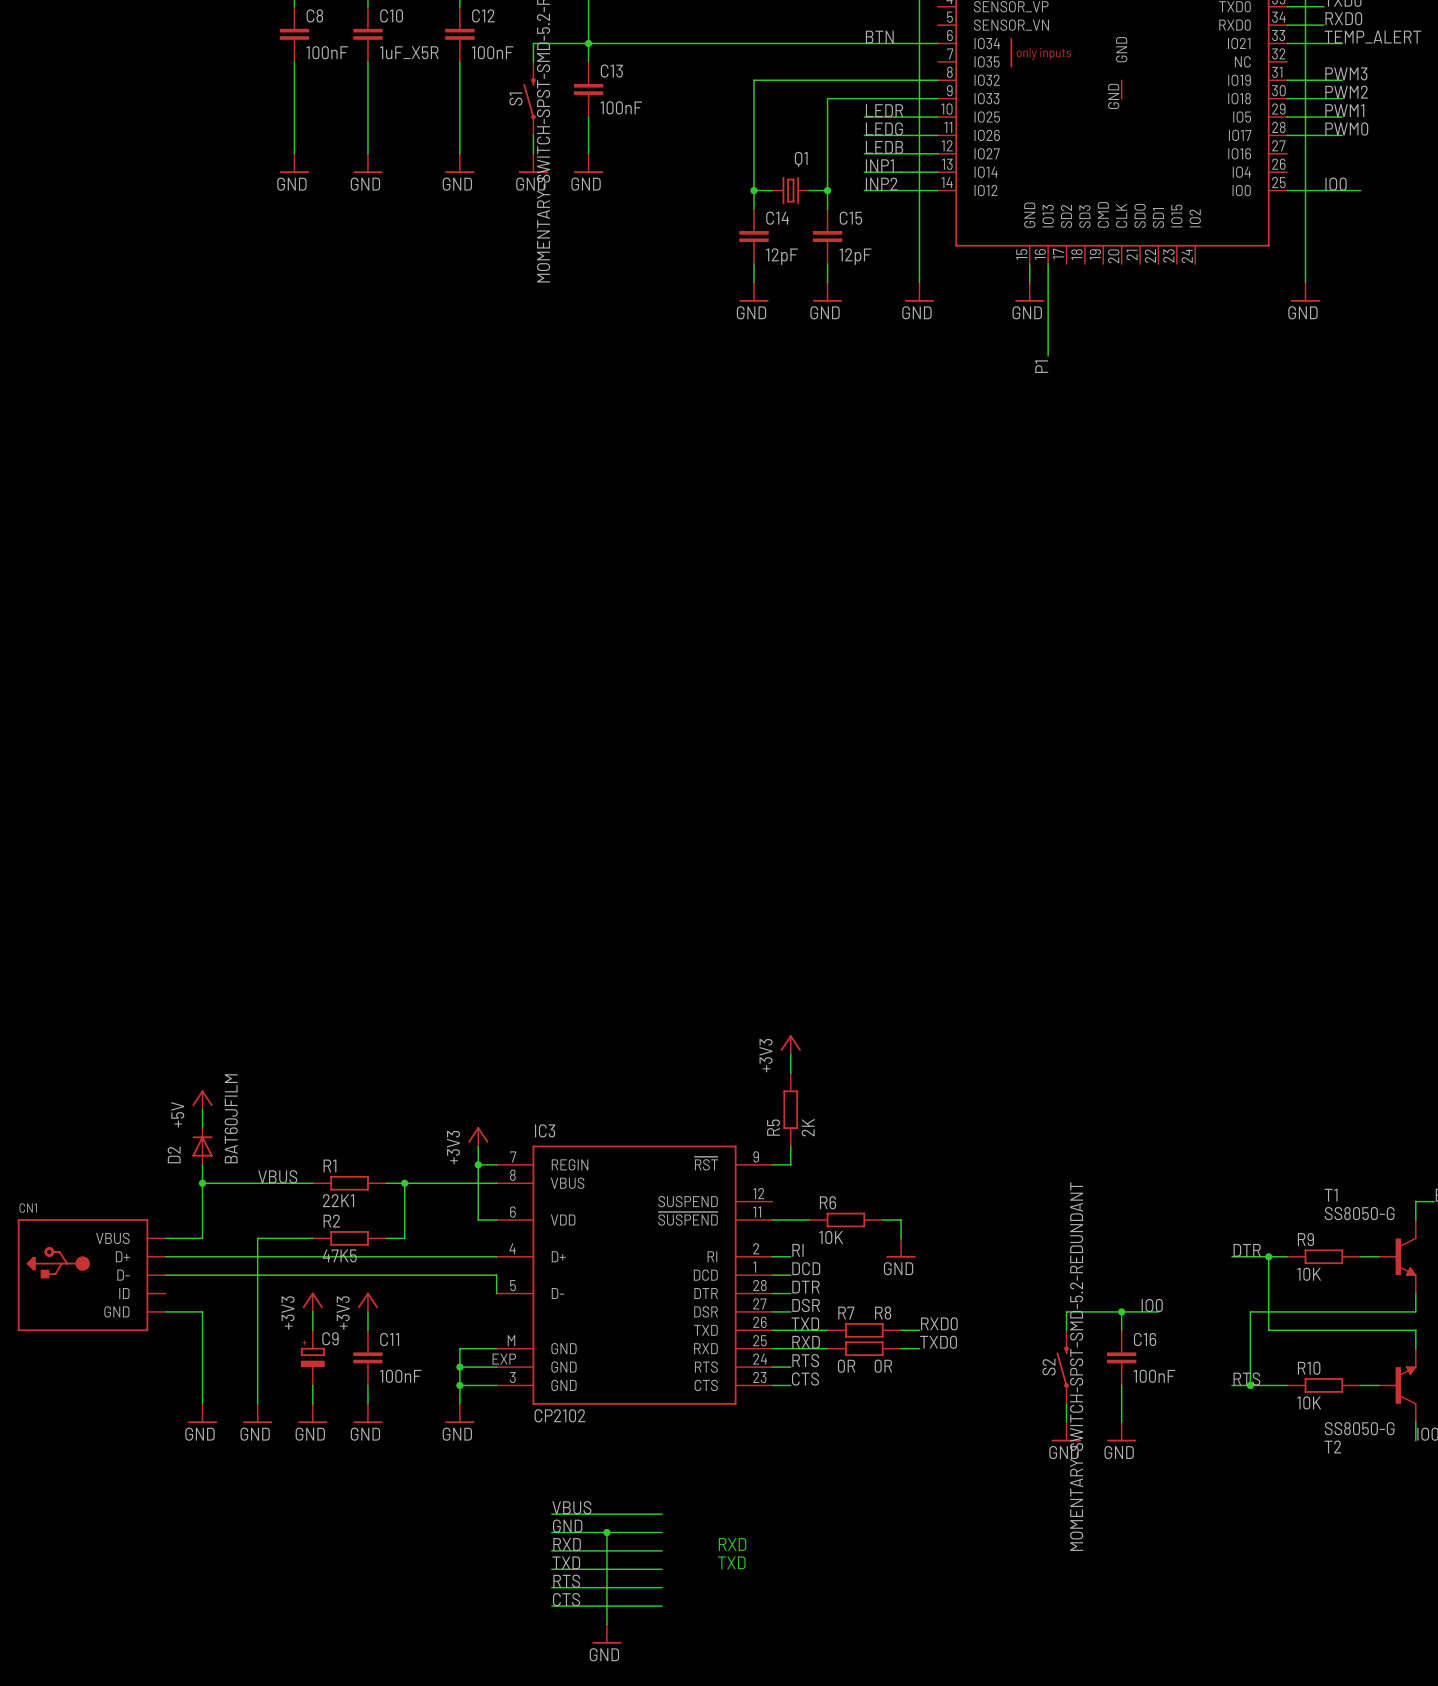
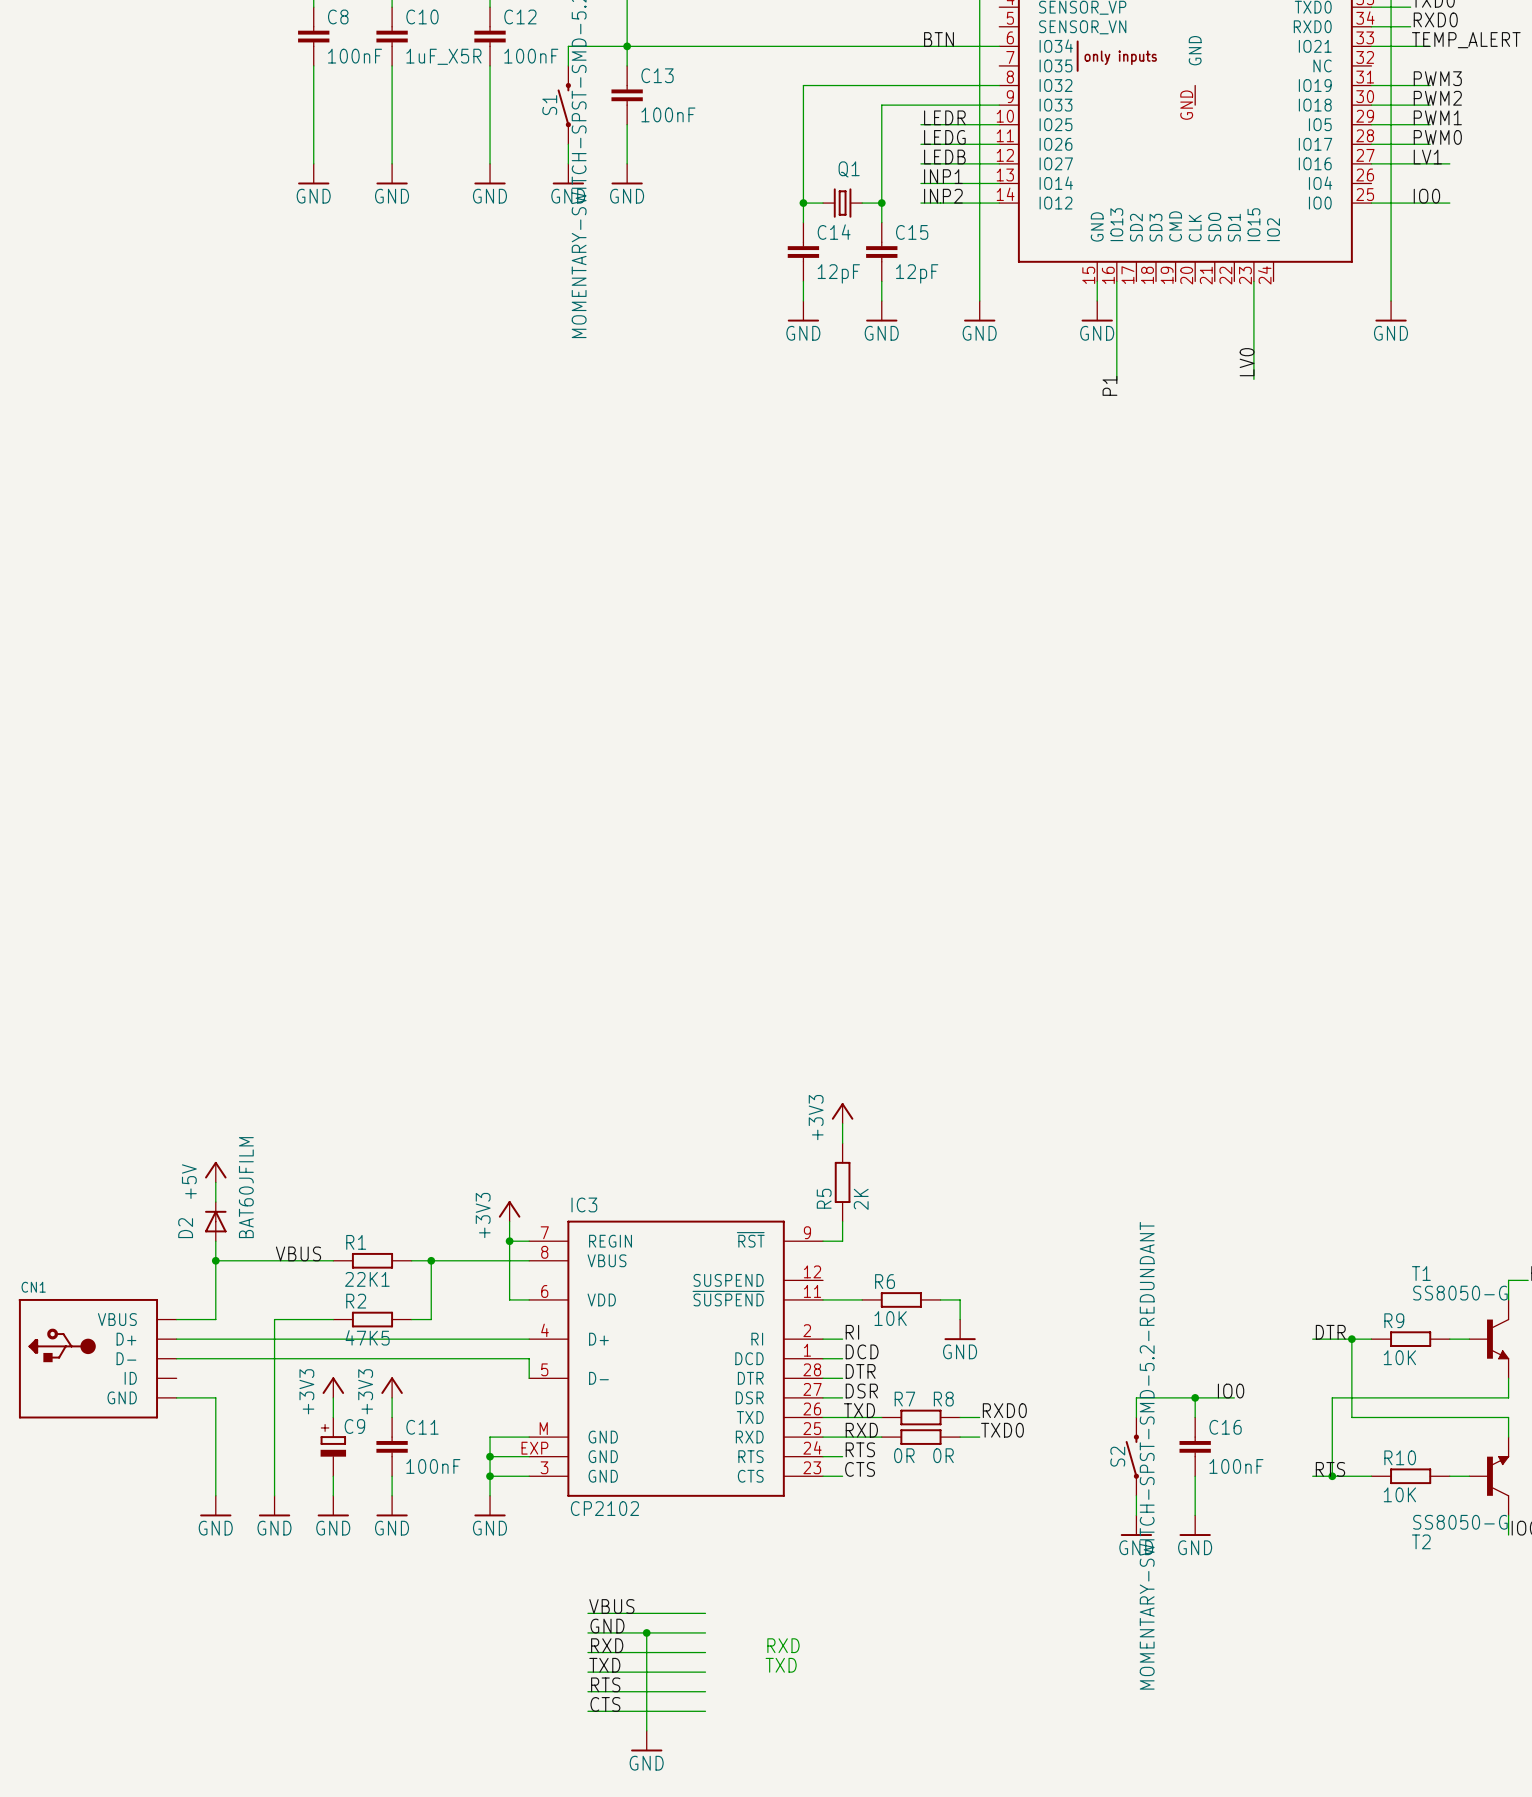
label: none -> LV1 (1427, 157)
wire: none -> (1371, 163) (1449, 163)
wire: none -> (1253, 281) (1253, 379)
label: none -> LV0 (1247, 362)

